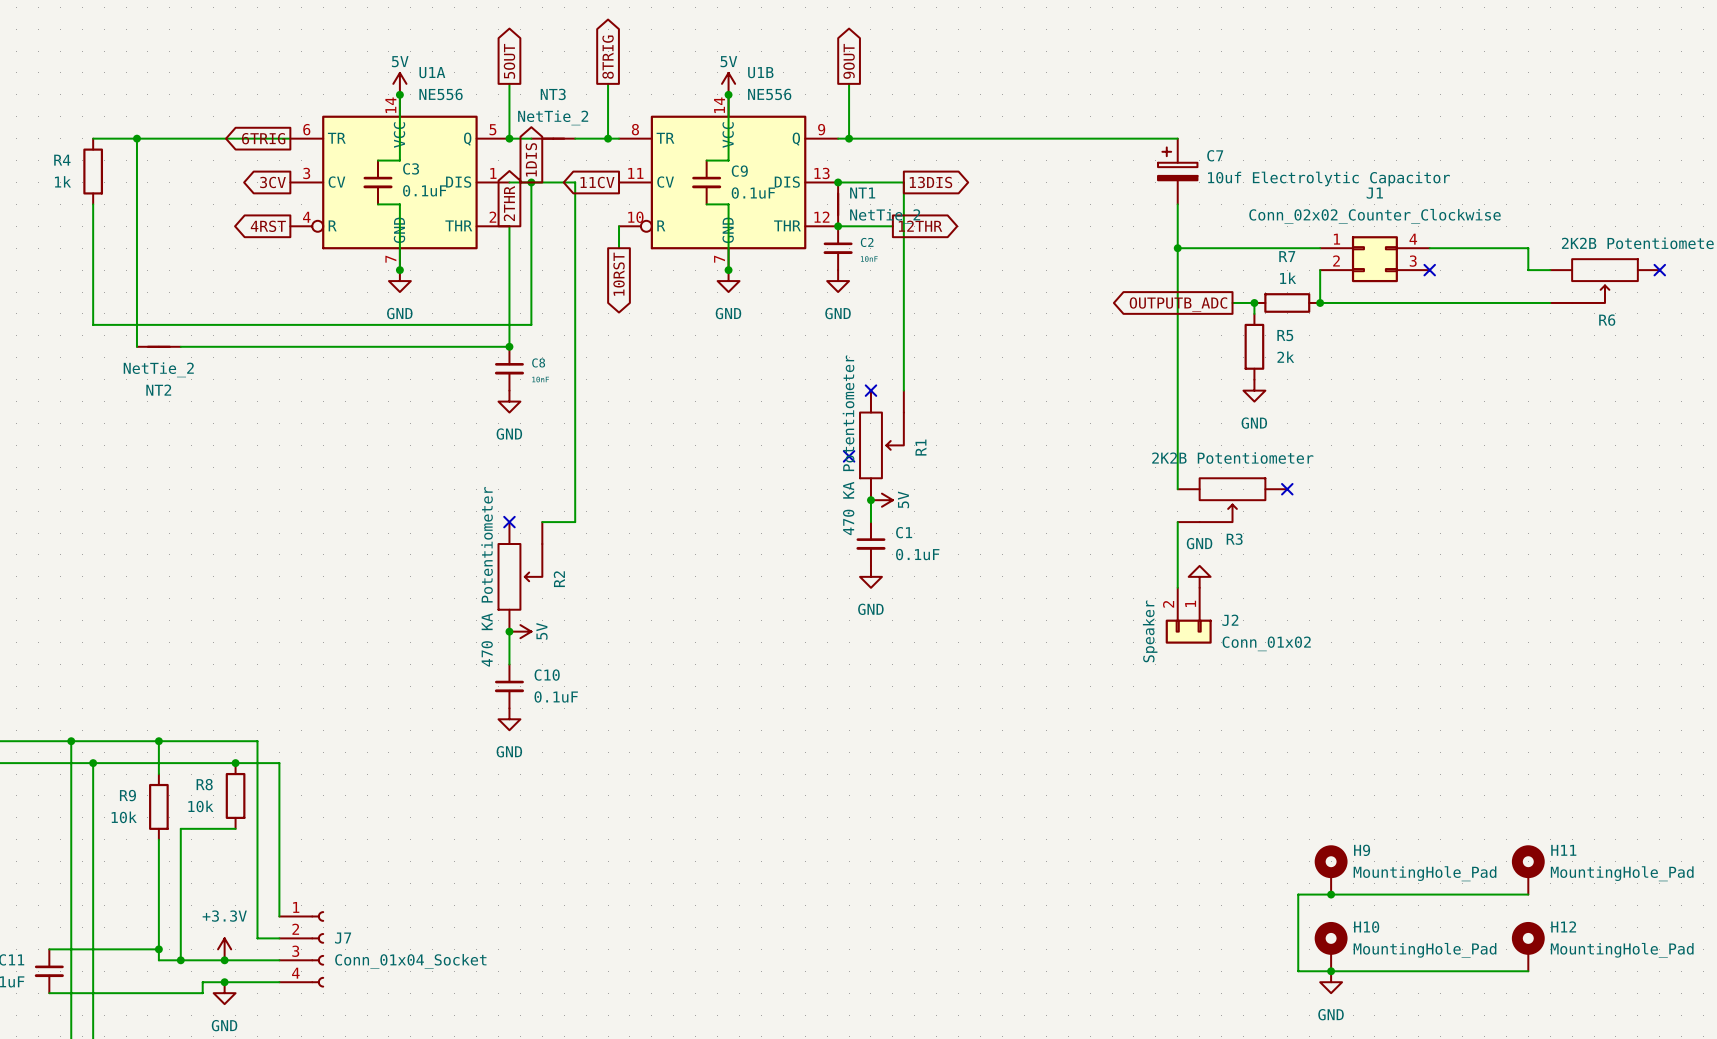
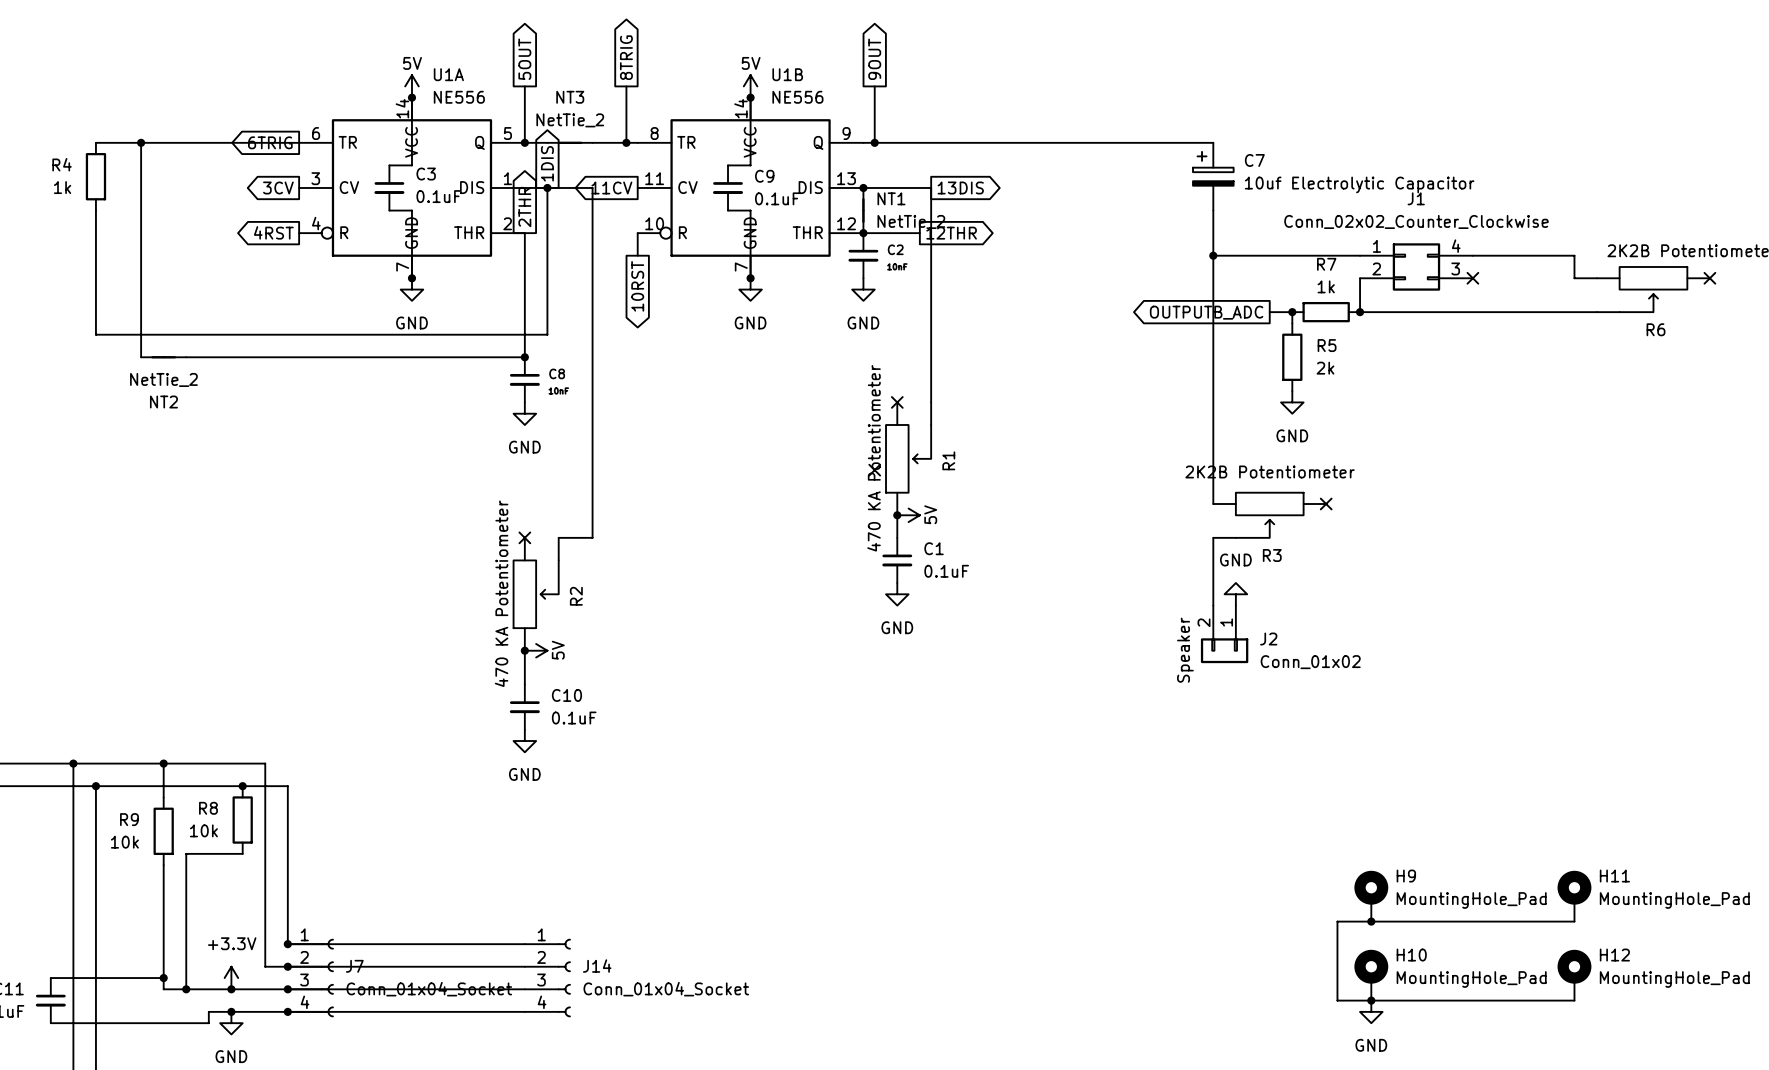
wire: none -> (287, 944) (524, 944)
junction: none -> (287, 944)
wire: none -> (287, 966) (524, 966)
junction: none -> (287, 966)
J14: none -> Conn_01x04_Socket (547, 978)
wire: none -> (287, 989) (524, 989)
junction: none -> (287, 989)
wire: none -> (287, 1011) (524, 1011)
junction: none -> (287, 1011)

